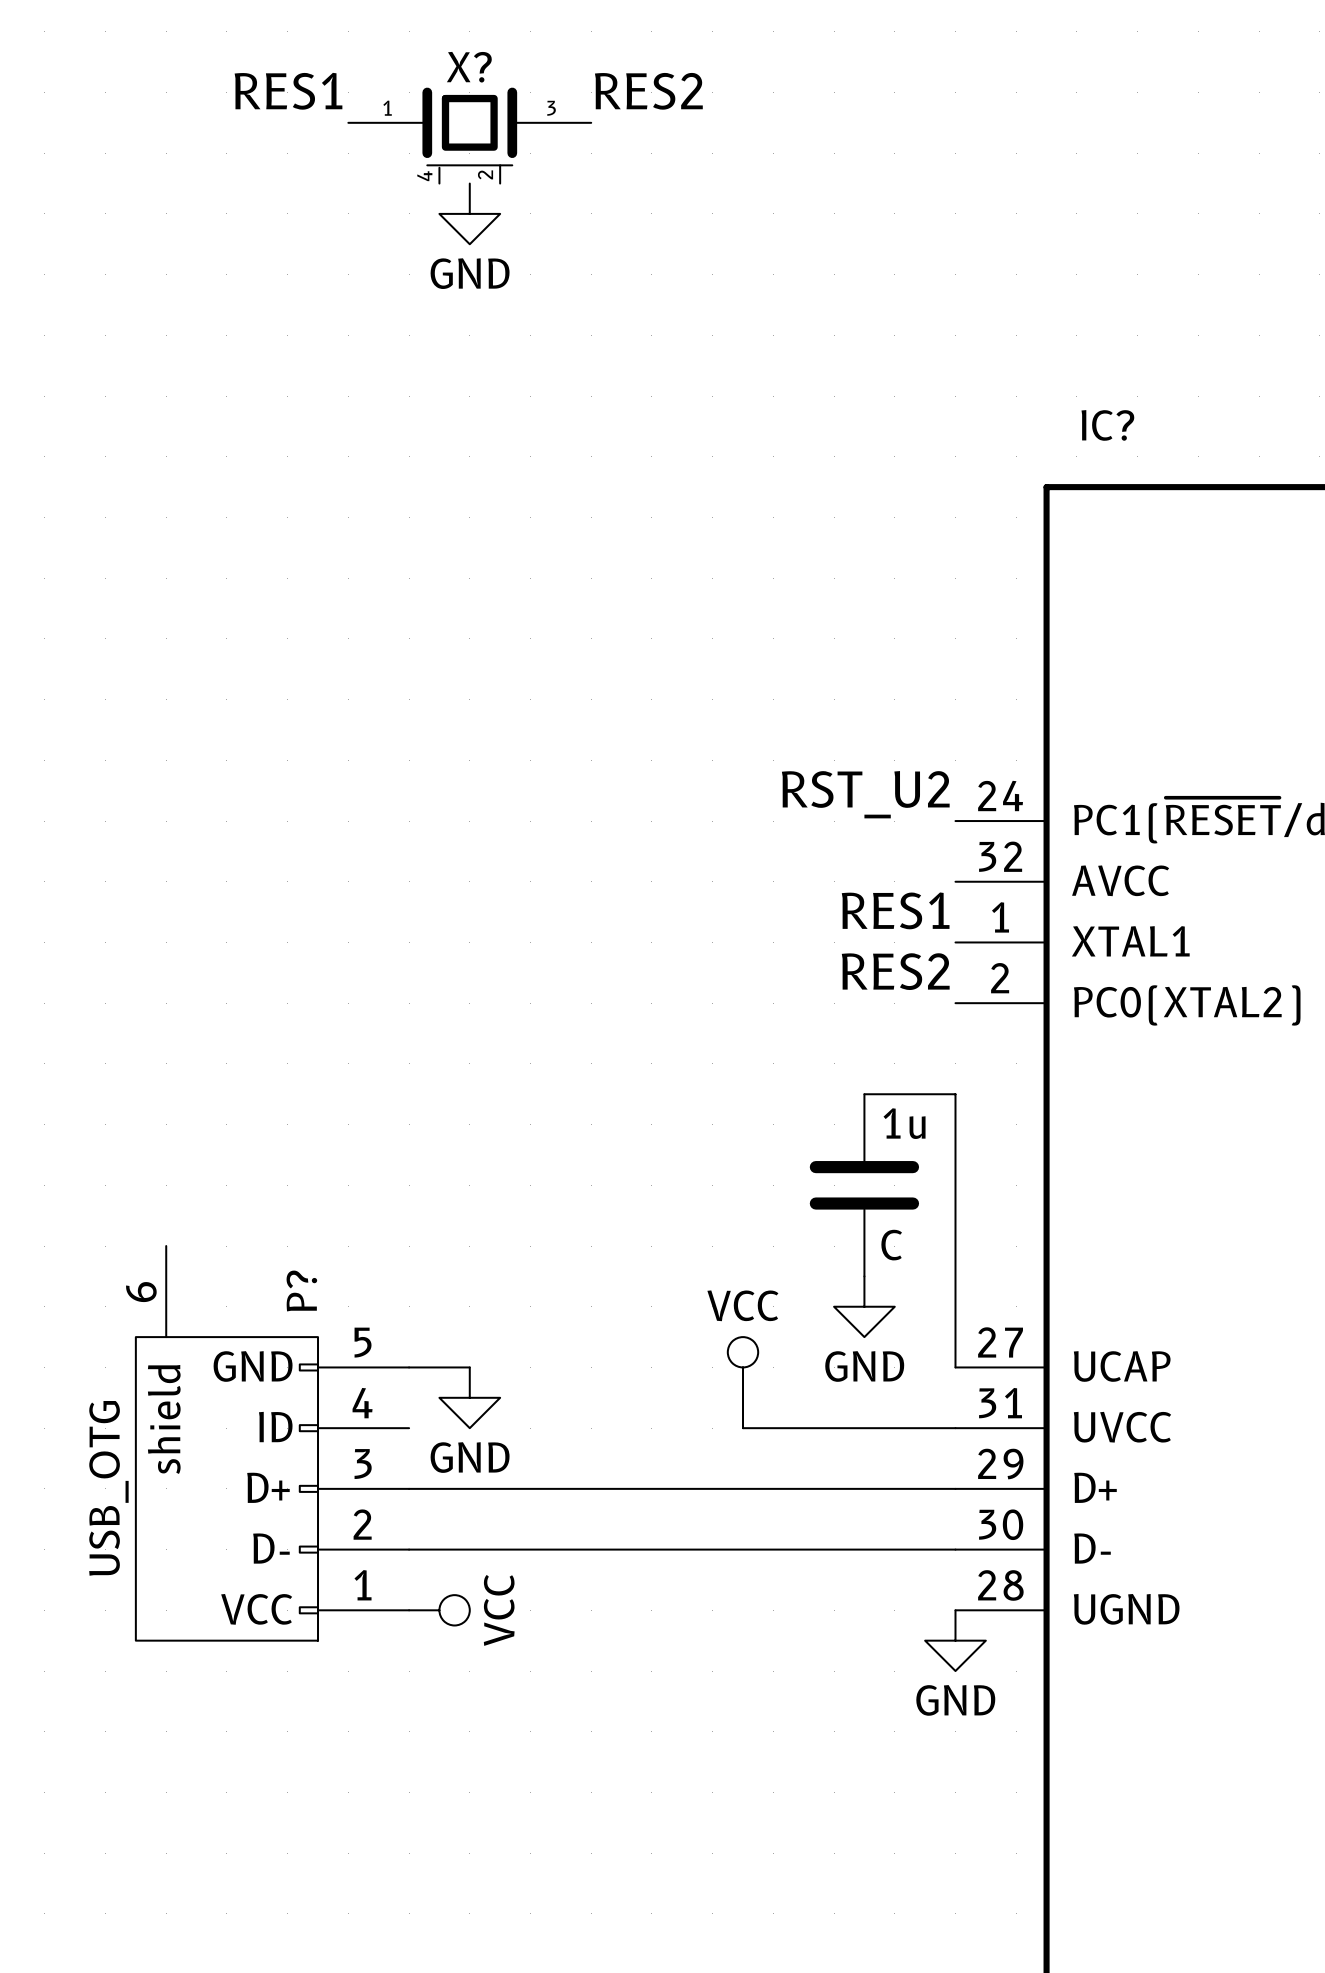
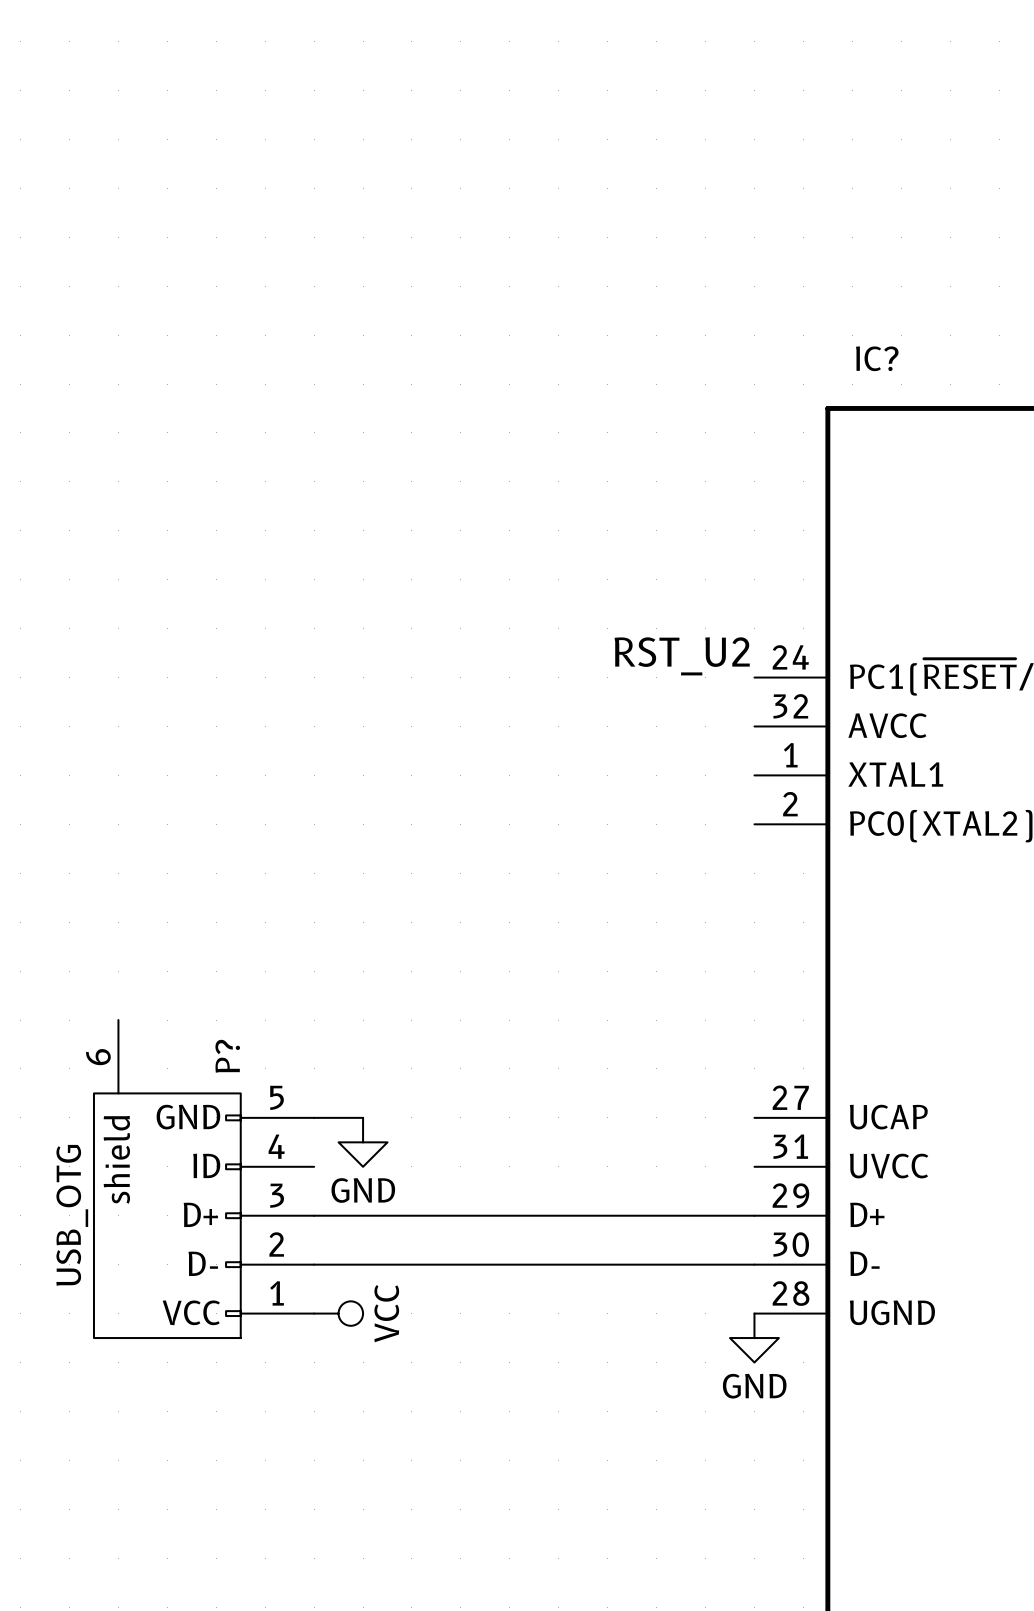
label: RES1 (288, 91) -> none
label: RES2 (648, 91) -> none
X?: (469, 135) -> none
power symbol: GND (469, 213) -> none
label: RES1 (895, 910) -> none
label: RES2 (895, 971) -> none
wire: (864, 1094) (955, 1094) (955, 1367) -> none
1u: C (864, 1185) -> none
power symbol: GND (864, 1306) -> none
power symbol: VCC (743, 1367) -> none
wire: (743, 1397) (743, 1428) (955, 1428) -> none

